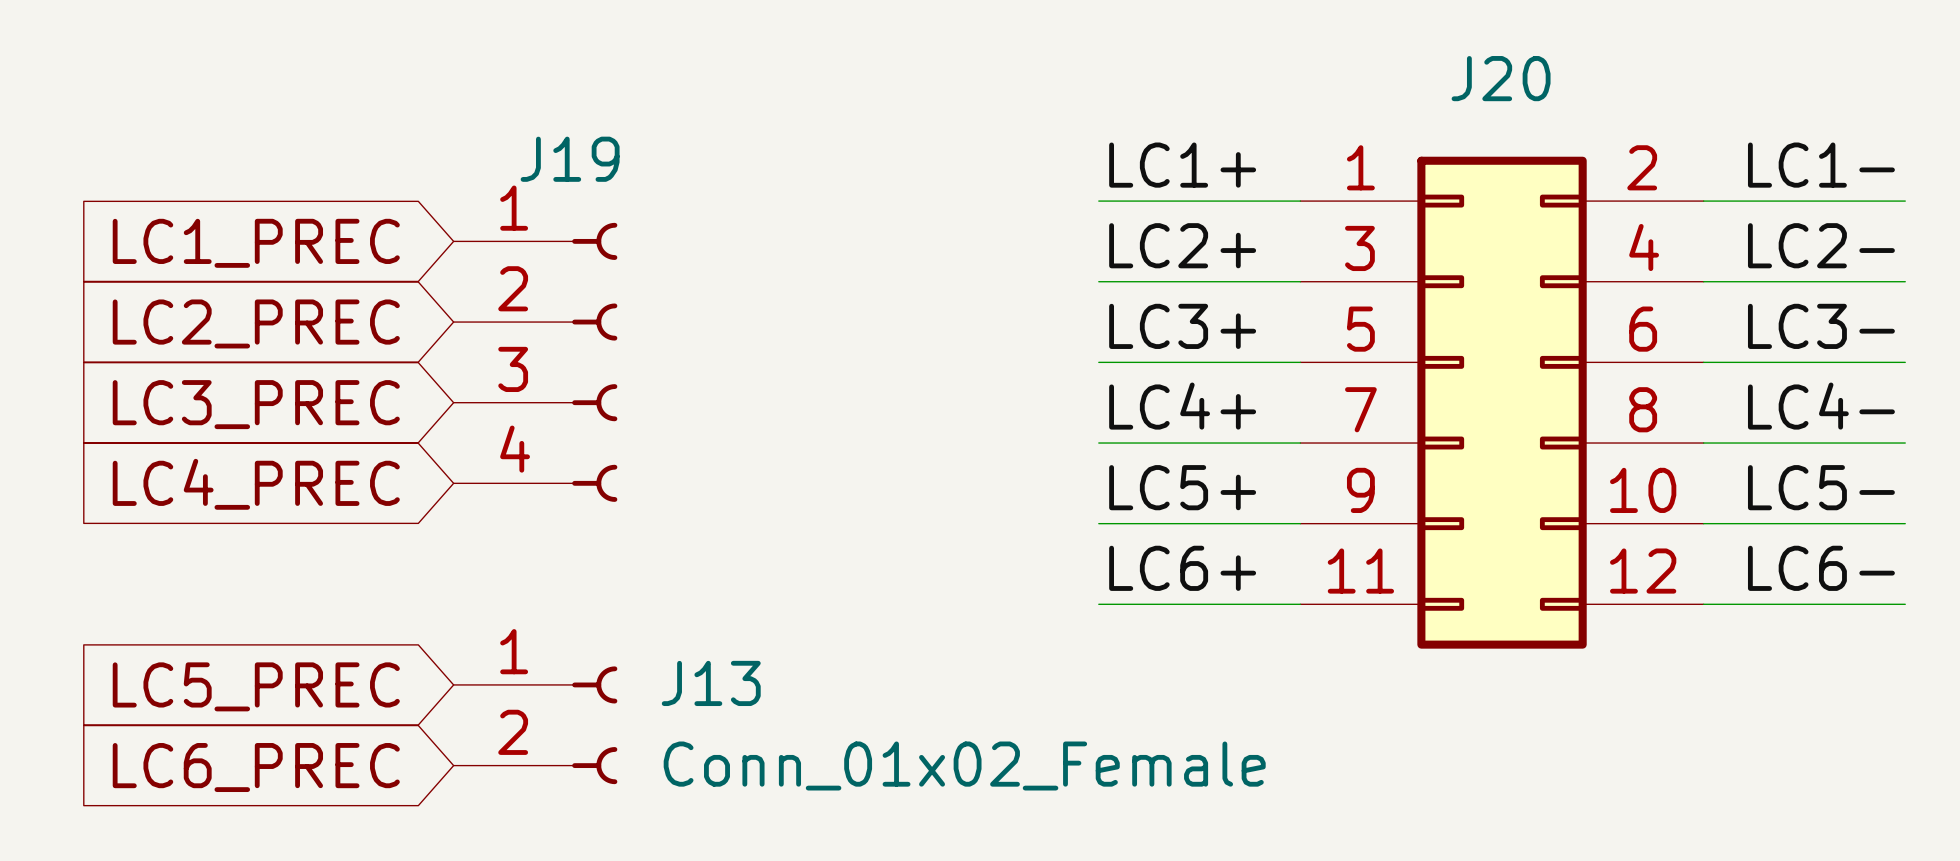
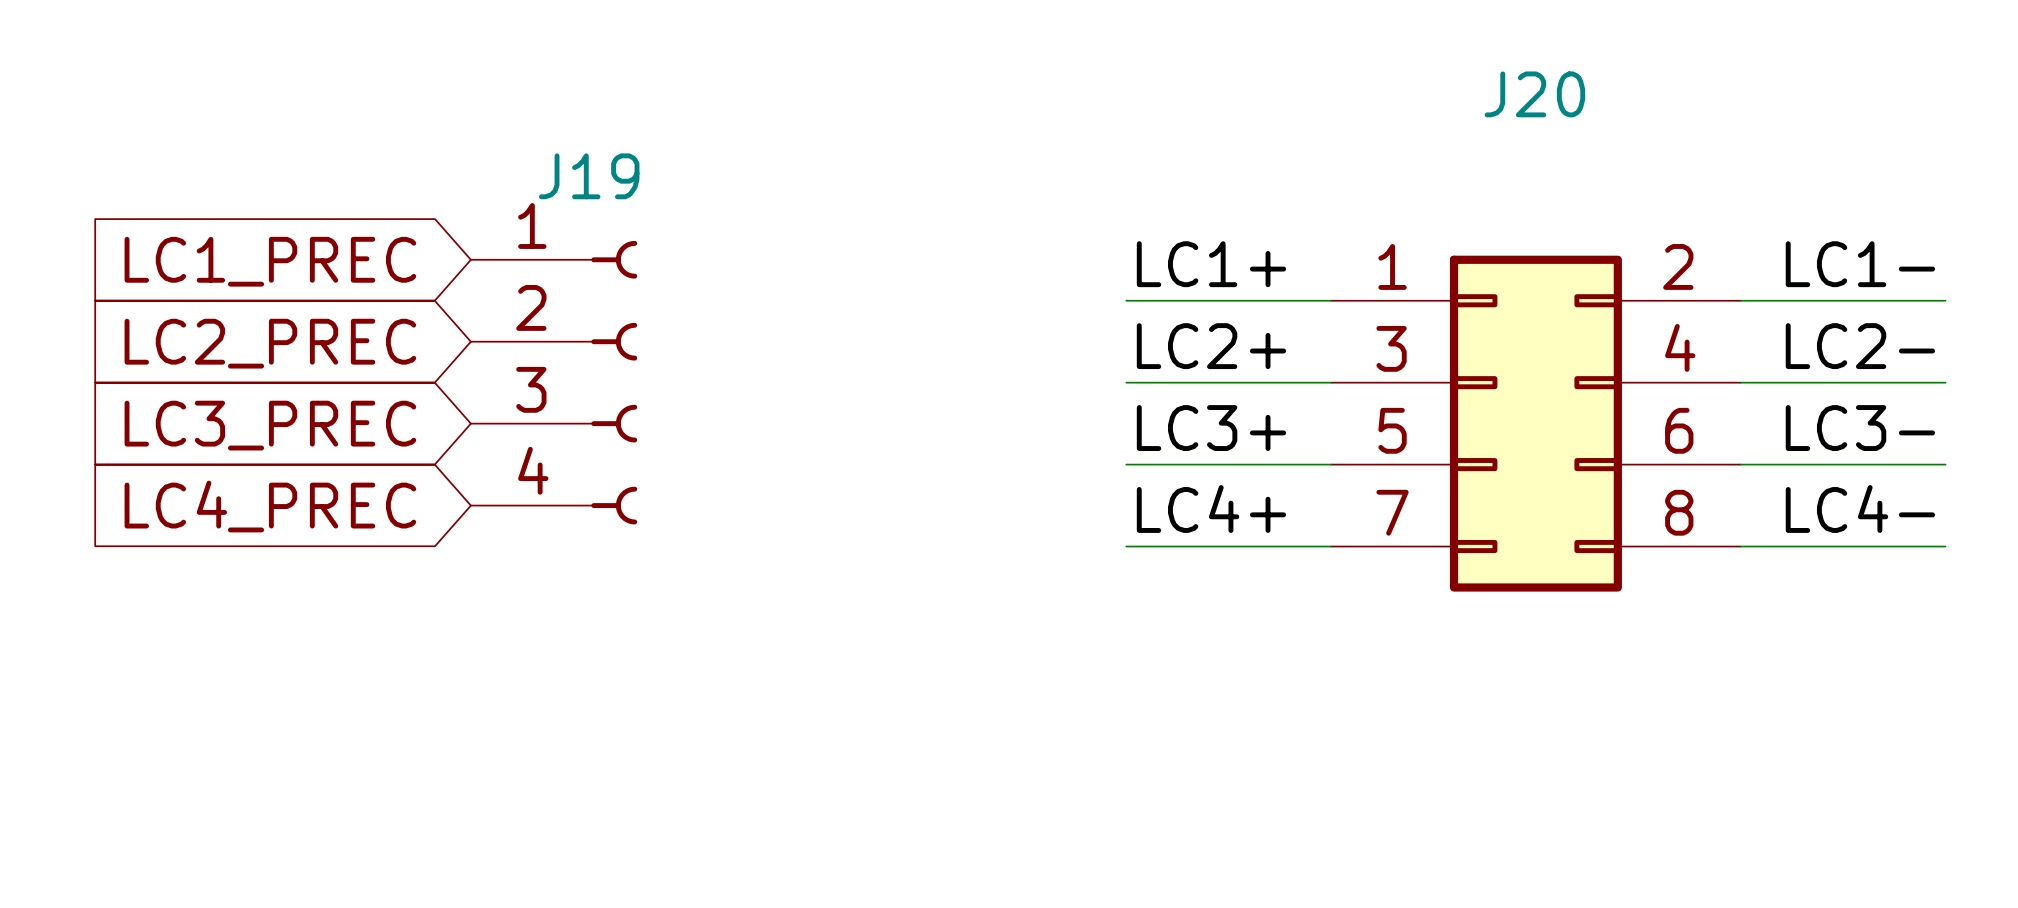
J20 symbol: [1300, 156, 1704, 649] -> [1331, 255, 1741, 592]
label: LC1+ (1182, 165) -> none
label: LC1- (1821, 165) -> none
wire: (1098, 201) (1300, 201) -> none
wire: (1703, 201) (1905, 201) -> none
label: LC2+ (1182, 245) -> LC1+ (1211, 264)
label: LC2- (1821, 245) -> LC1- (1860, 264)
label: LC3+ (1182, 326) -> LC2+ (1211, 346)
label: LC3- (1821, 326) -> LC2- (1860, 346)
label: LC4+ (1182, 406) -> LC3+ (1211, 428)
label: LC4- (1821, 406) -> LC3- (1860, 428)
label: LC5+ (1182, 487) -> LC4+ (1211, 508)
label: LC5- (1821, 487) -> LC4- (1860, 508)
label: LC6+ (1182, 568) -> none
label: LC6- (1821, 568) -> none
wire: (1098, 604) (1300, 604) -> none
wire: (1703, 604) (1905, 604) -> none
global label: LC5_PREC (256, 686) -> none
J13: Conn_01x02_Female (535, 725) -> none
global label: LC6_PREC (256, 767) -> none

